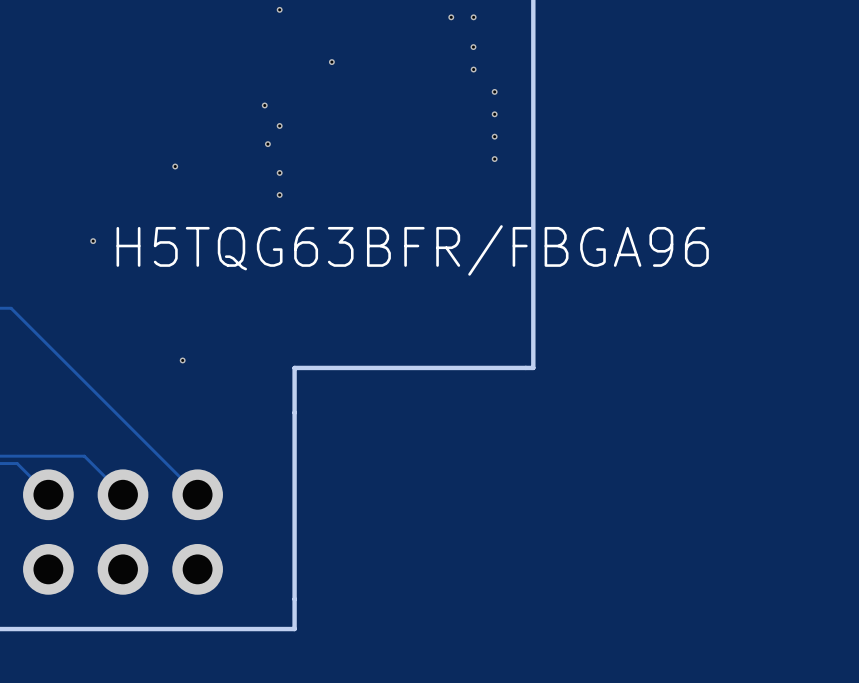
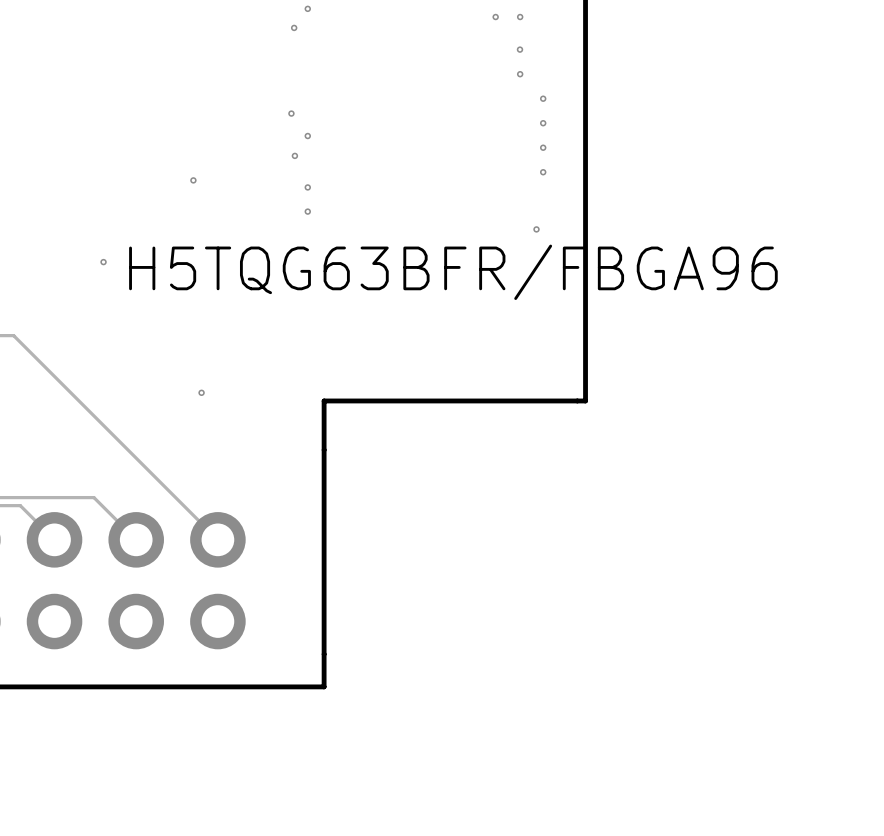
via: none -> (294, 27)
via: (331, 62) -> none
via: none -> (536, 229)

